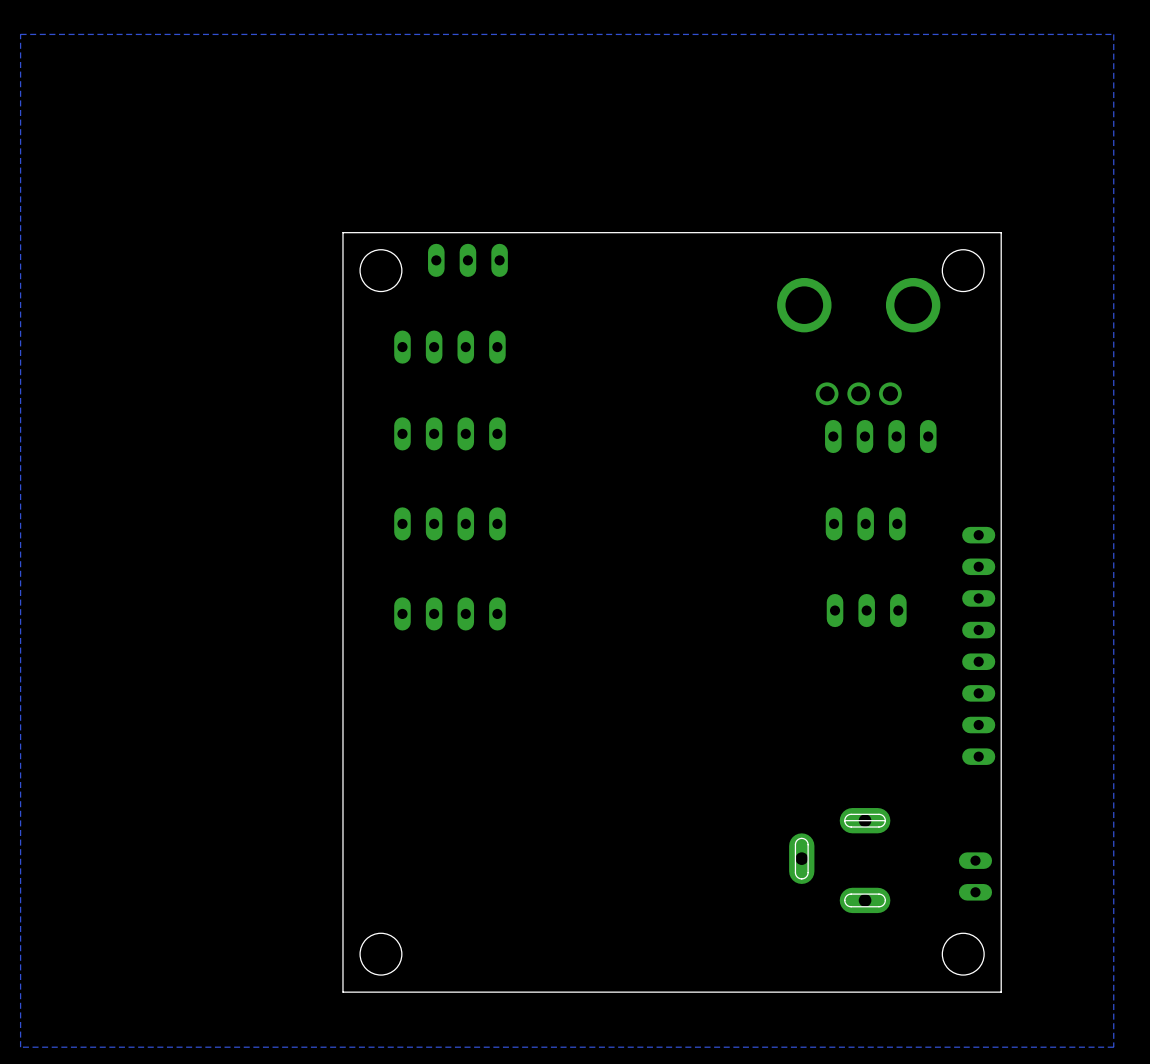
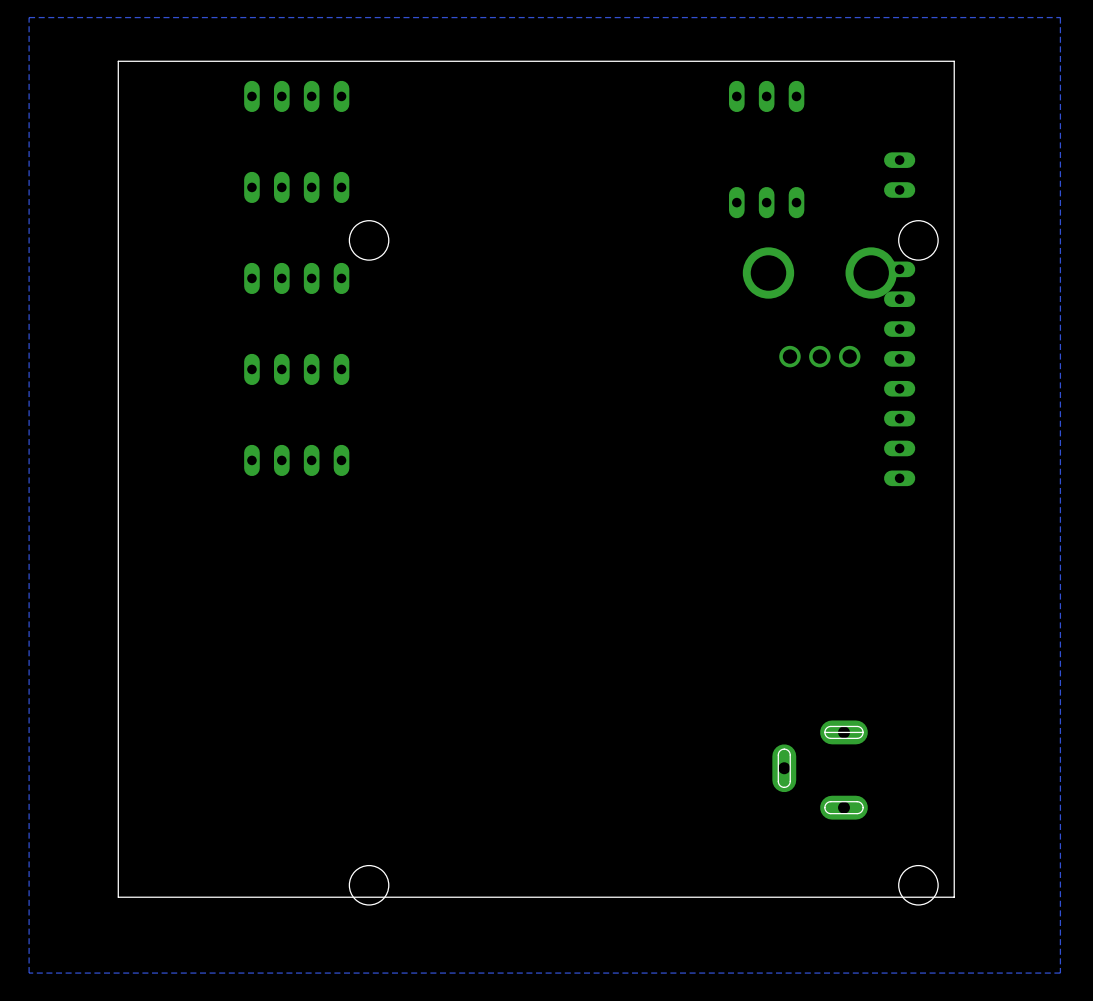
part: none -> (296, 96)
part: none -> (766, 96)
part: none -> (899, 175)
part: none -> (296, 187)
part: none -> (766, 202)
board edge: (1001, 232) (342, 232) (342, 992) (1001, 992) (1001, 966) -> (954, 204) (954, 61) (118, 61) (118, 897) (954, 897)
part: (467, 260) -> none
part: none -> (296, 278)
part: (449, 347) -> none
part: none -> (296, 369)
part: (449, 433) -> none
part: (880, 436) -> none
part: none -> (296, 460)
part: (449, 523) -> none
part: (865, 523) -> none
part: (866, 610) -> none
part: (449, 613) -> none
part position: (978, 645) -> (899, 373)
part position: (839, 860) -> (820, 770)
part: (975, 876) -> none

